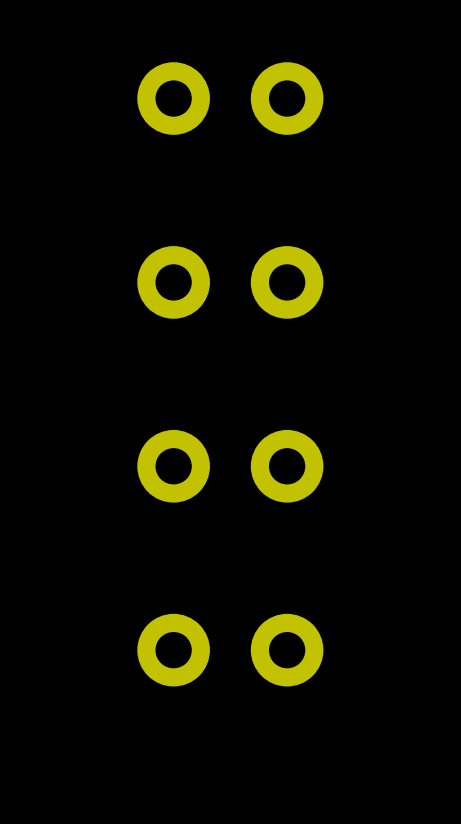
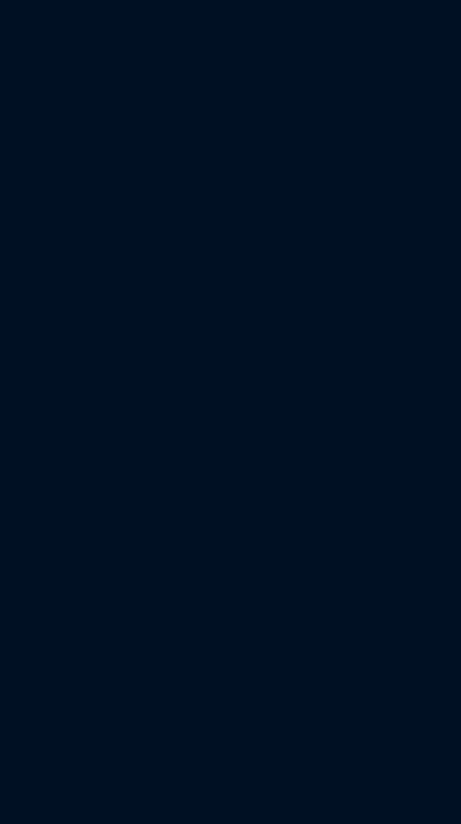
part: (230, 98) -> none
part: (230, 282) -> none
part: (230, 466) -> none
part: (230, 650) -> none

